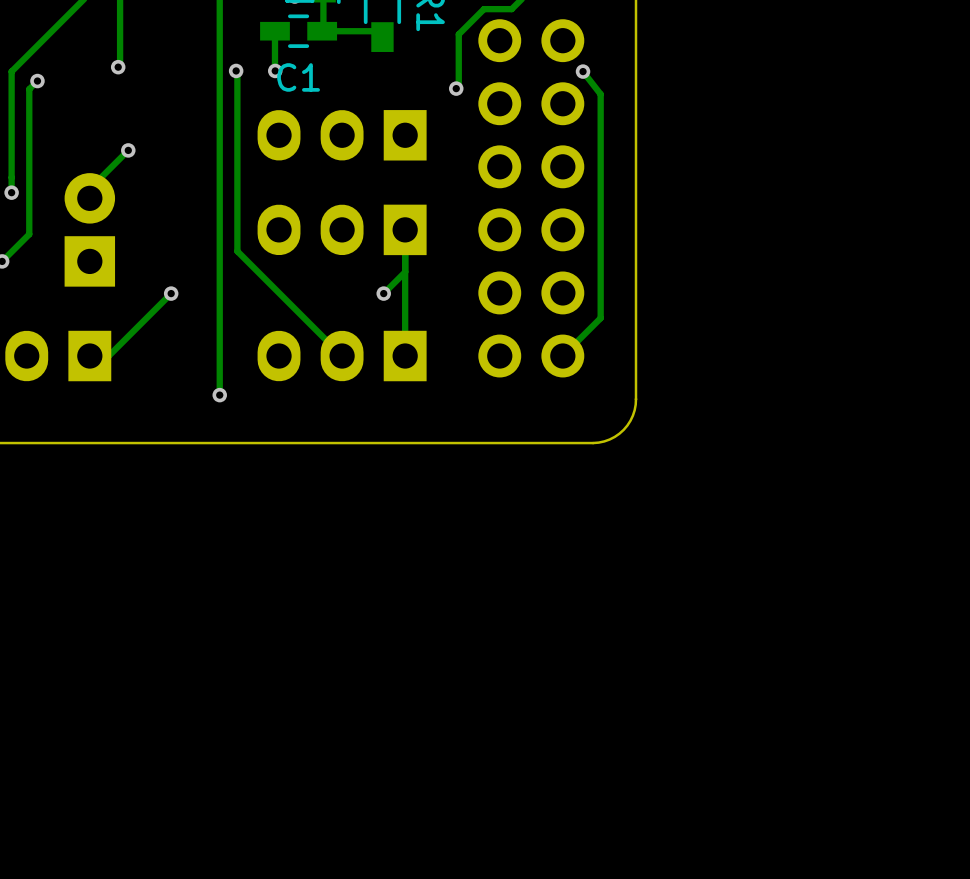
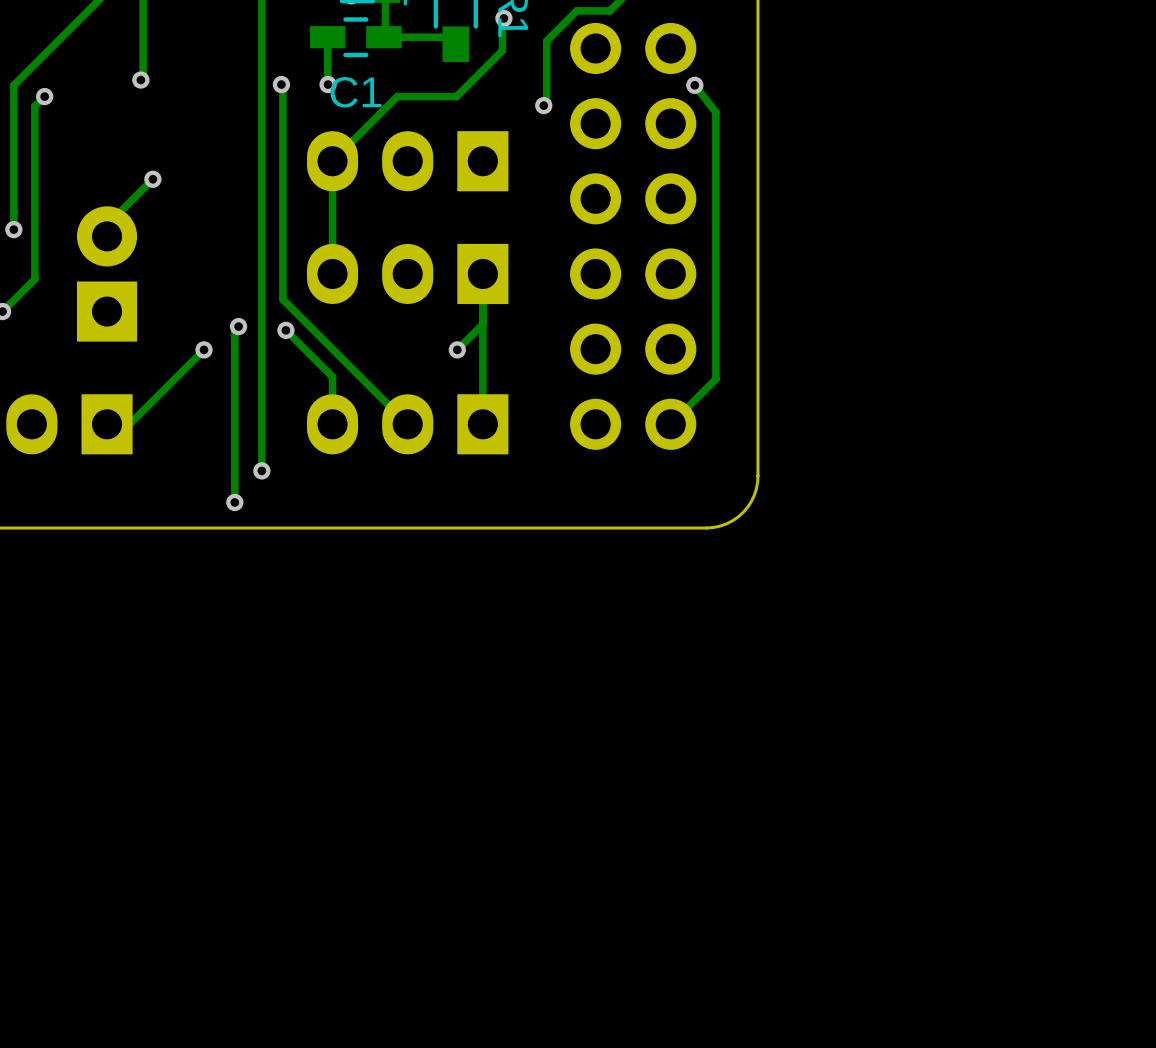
track: none -> (503, 18) (502, 50) (456, 96) (397, 96) (332, 161) (332, 273)
via: none -> (503, 18)
track: none -> (238, 326) (234, 330) (234, 502)
via: none -> (238, 326)
track: none -> (285, 330) (332, 376) (332, 424)
via: none -> (285, 330)
via: none -> (234, 502)

